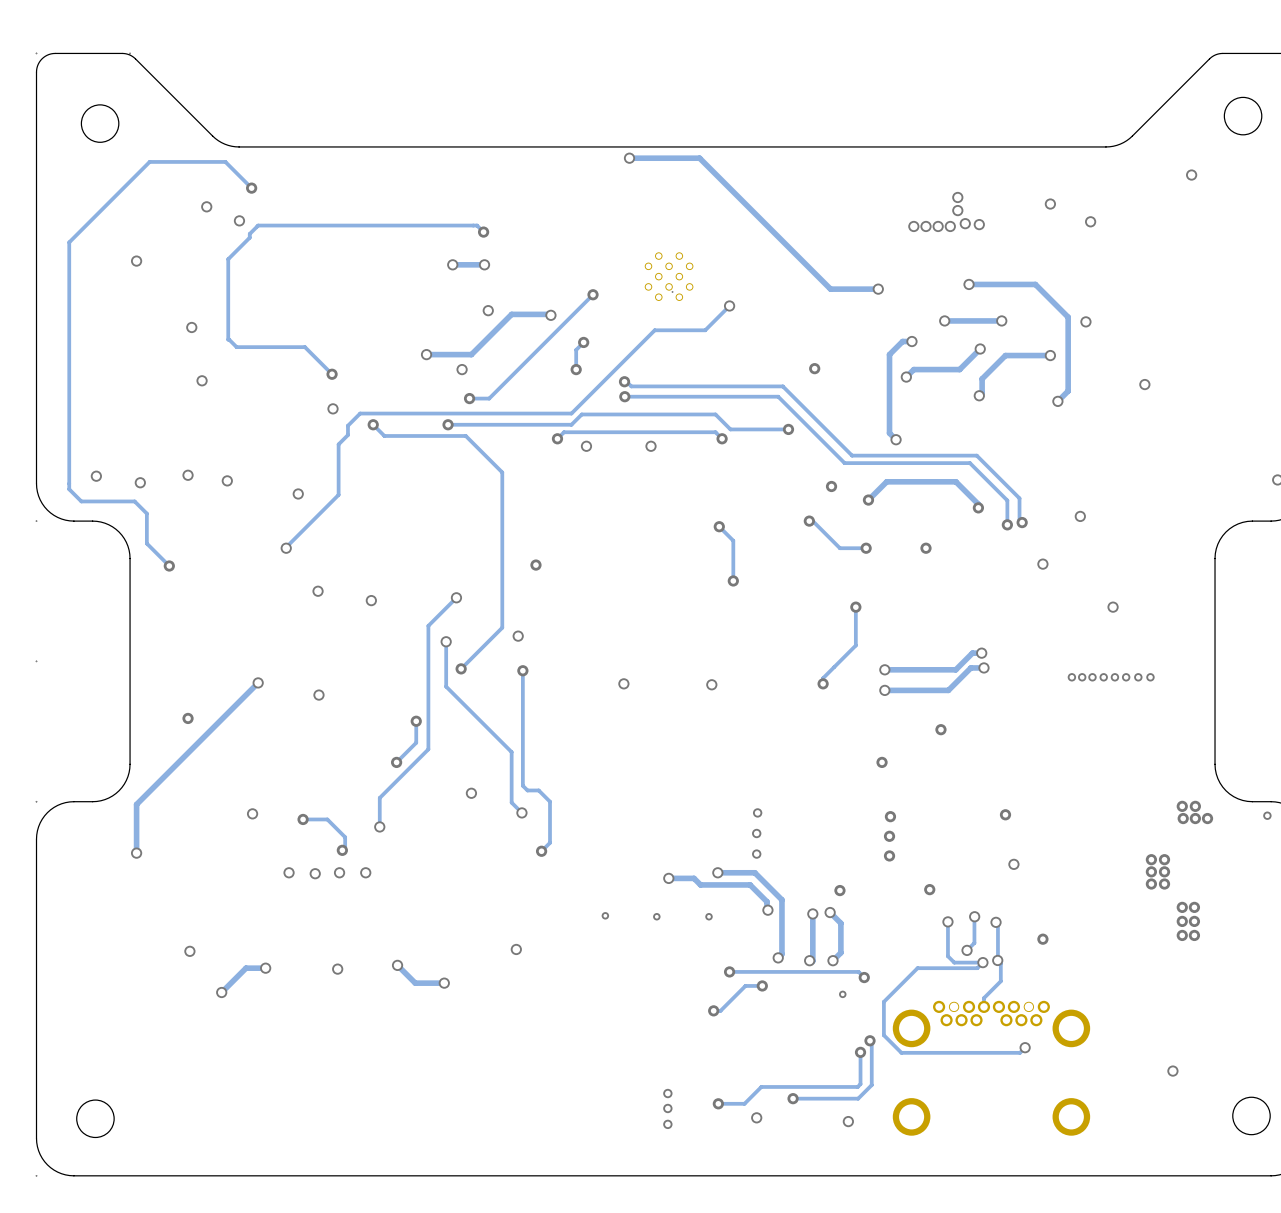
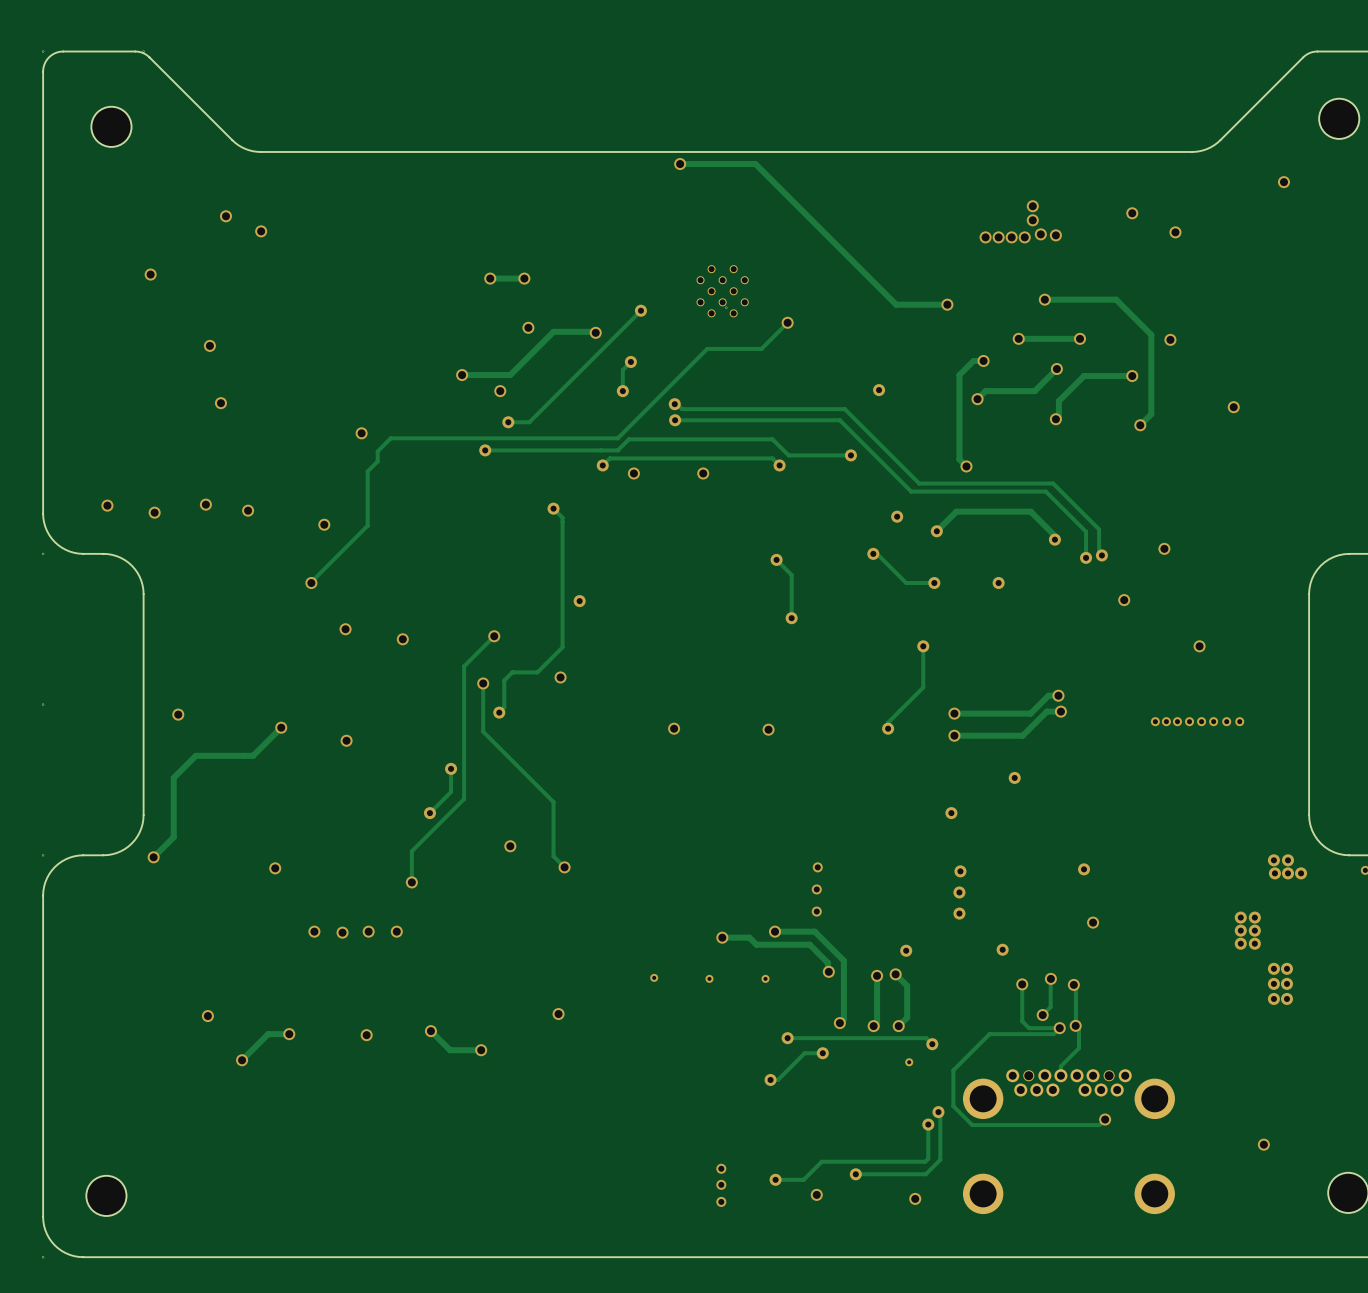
track: (251, 188) (225, 161) (149, 161) (69, 242) (69, 489) (81, 501) (134, 501) (146, 513) (146, 543) (169, 565) -> none
via: (251, 188) -> none
track: (483, 232) (477, 225) (258, 225) (249, 233) (249, 237) (228, 259) (228, 339) (236, 347) (304, 347) (332, 374) -> none
via: (483, 232) -> none
via: (332, 374) -> none
track: (373, 424) (384, 435) (465, 435) (502, 472) (502, 627) (465, 664) -> (553, 508) (562, 517) (562, 647) (537, 672) (512, 672) (504, 680) (504, 707)
via: (373, 424) -> none
via: none -> (553, 508)
via: (169, 565) -> none
via: none -> (178, 714)
track: (522, 670) (522, 785) (527, 790) (538, 790) (549, 801) (549, 842) (541, 851) -> none
via: (522, 670) -> none
track: (231, 709) (136, 804) (136, 853) -> (253, 755) (195, 755) (173, 777) (173, 837) (153, 857)
via: (188, 718) -> none
track: (303, 819) (327, 819) (345, 837) (345, 847) (342, 850) -> none
via: (303, 819) -> none
via: (342, 850) -> none
via: (541, 851) -> none
via position: (136, 853) -> (153, 857)
via: (1042, 939) -> none

